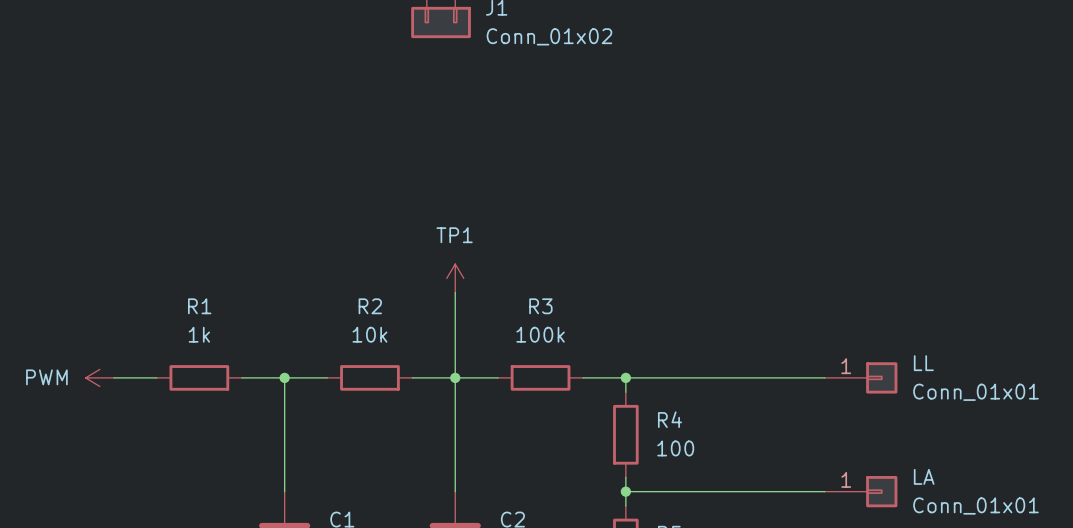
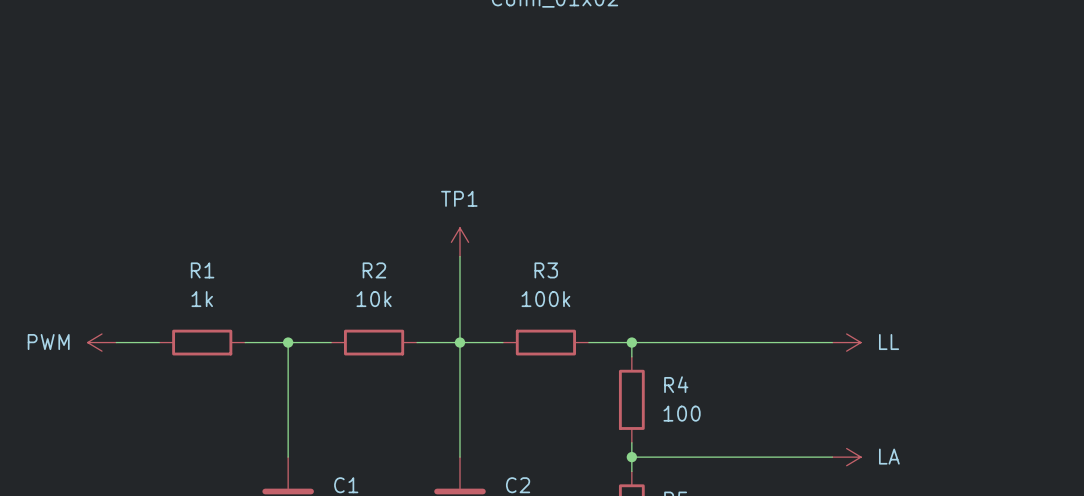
power symbol: none -> LL (846, 342)
LL: Conn_01x01 (861, 377) -> none
power symbol: none -> LA (846, 457)
LA: Conn_01x01 (861, 491) -> none

